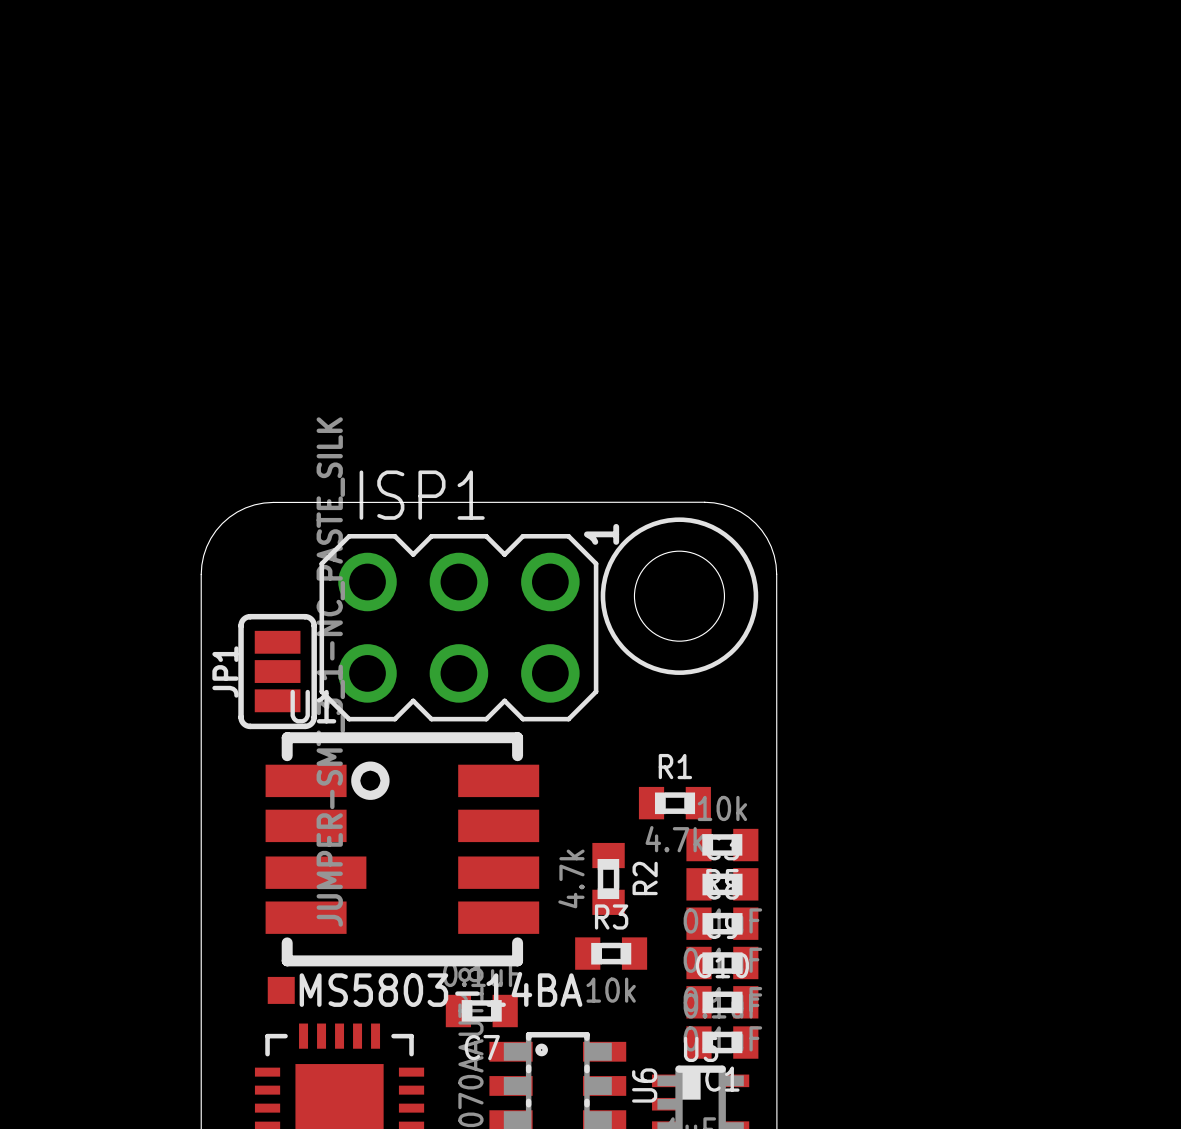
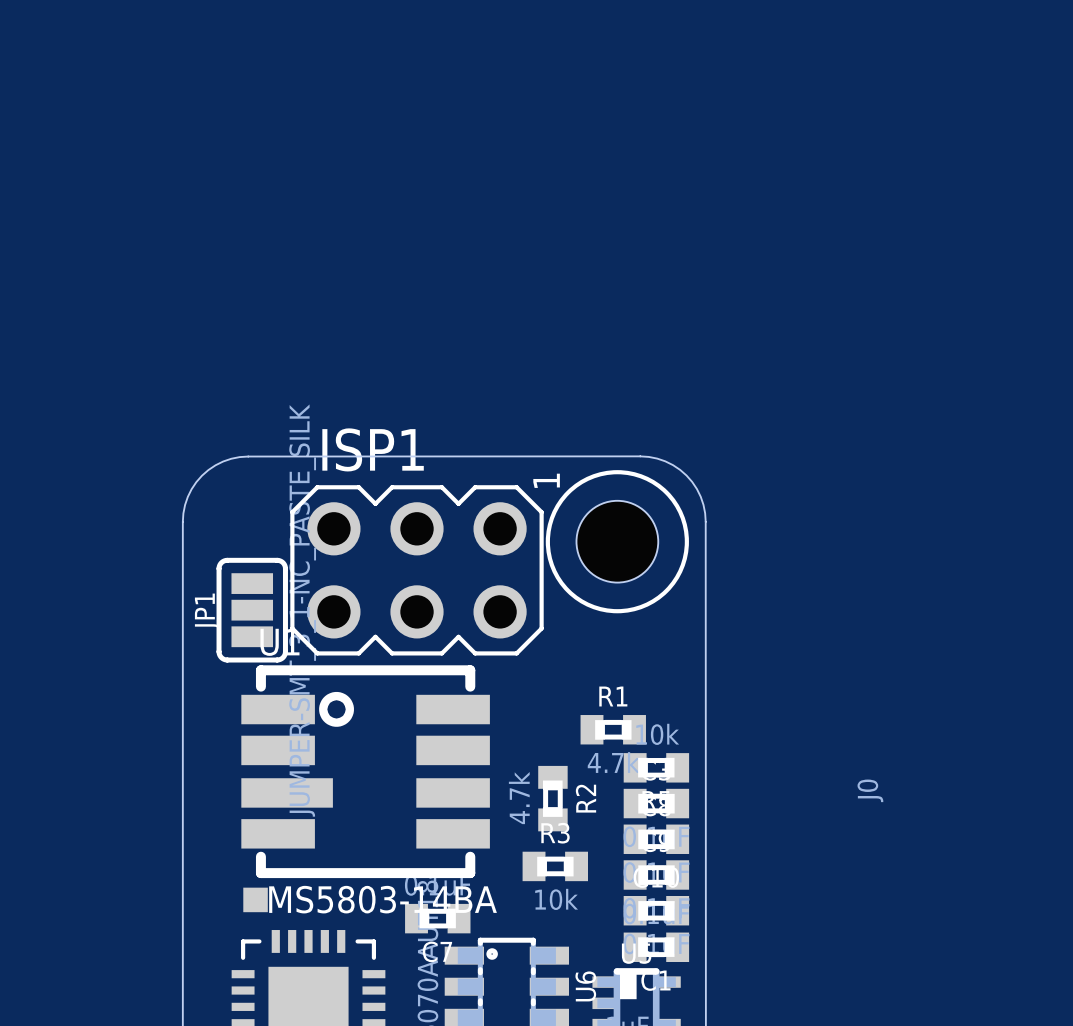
text: none -> J0 (870, 790)

